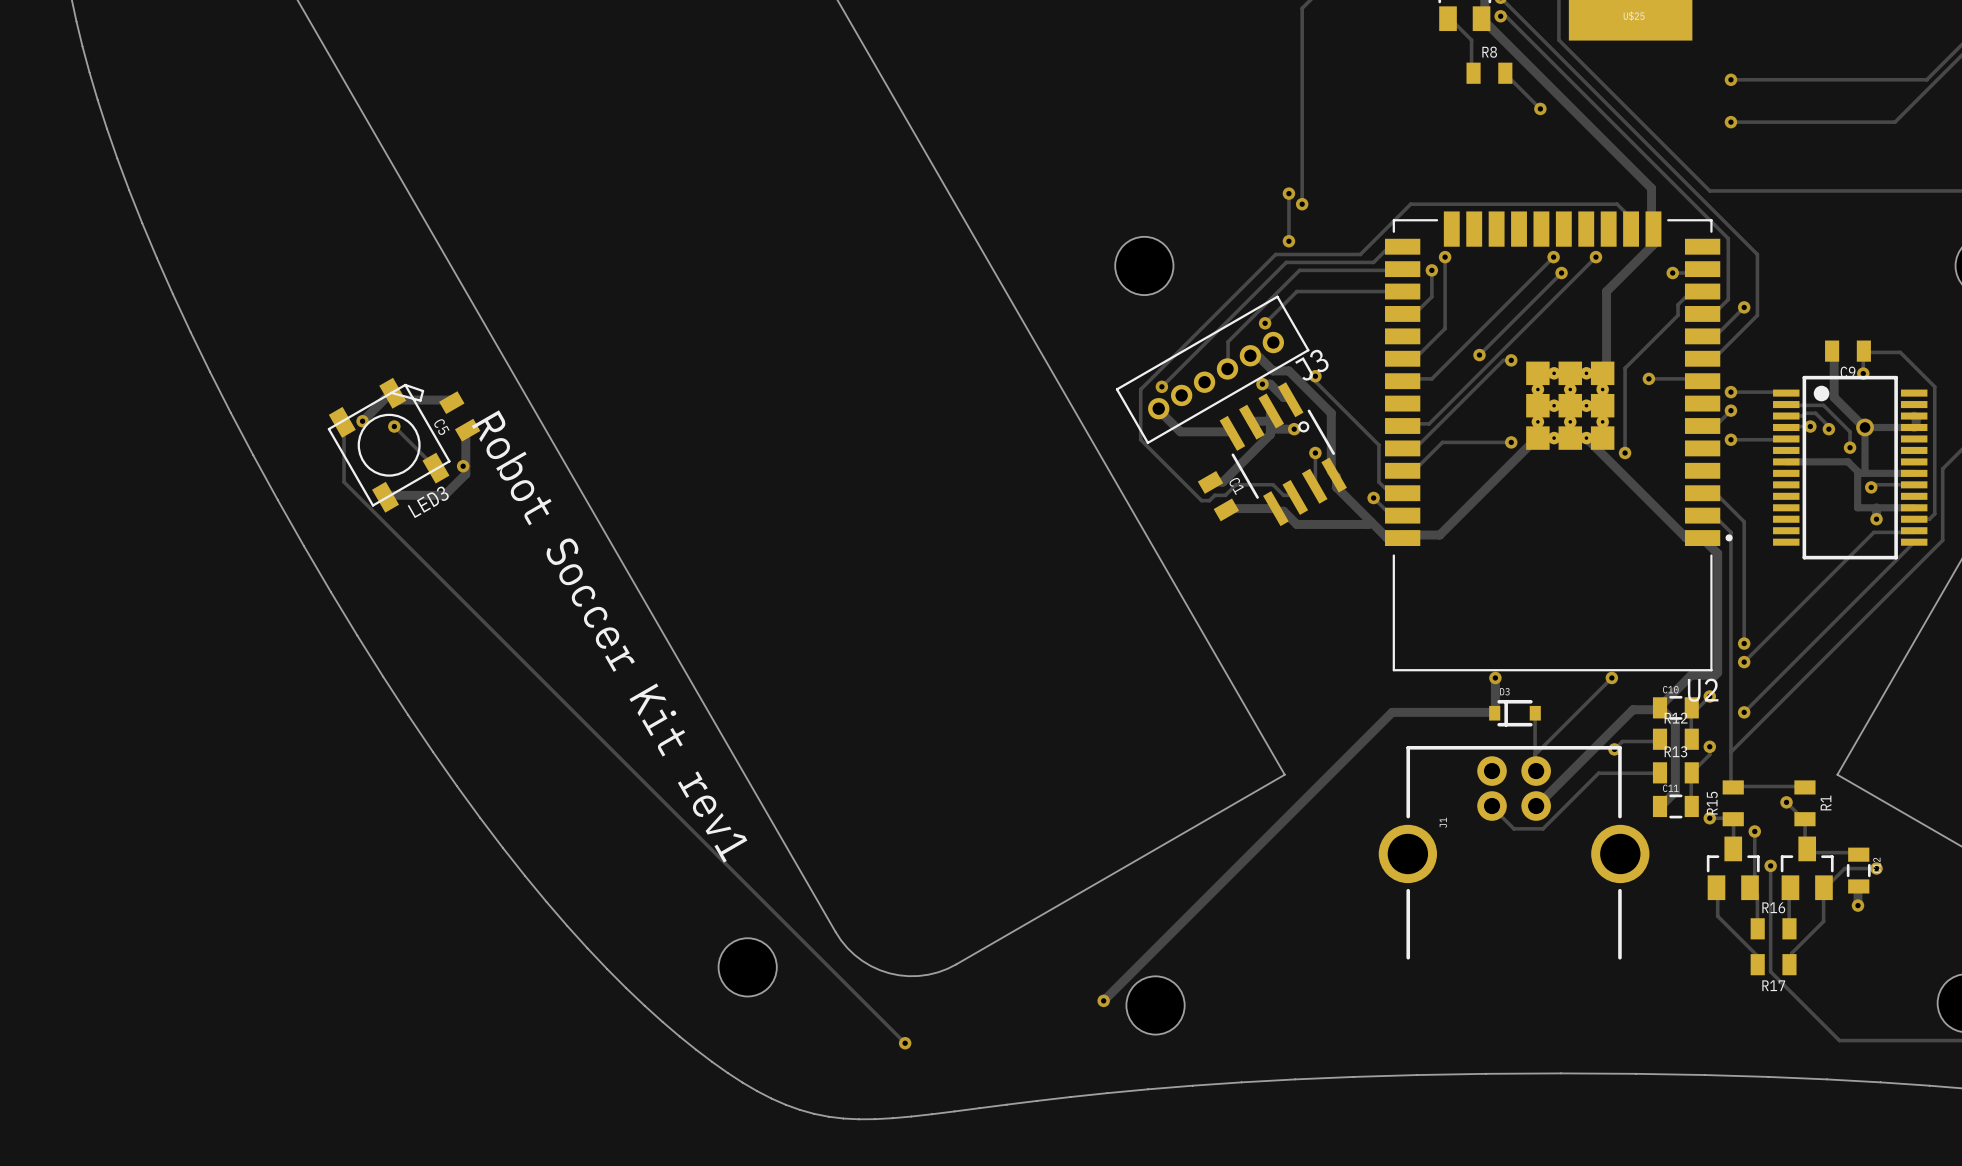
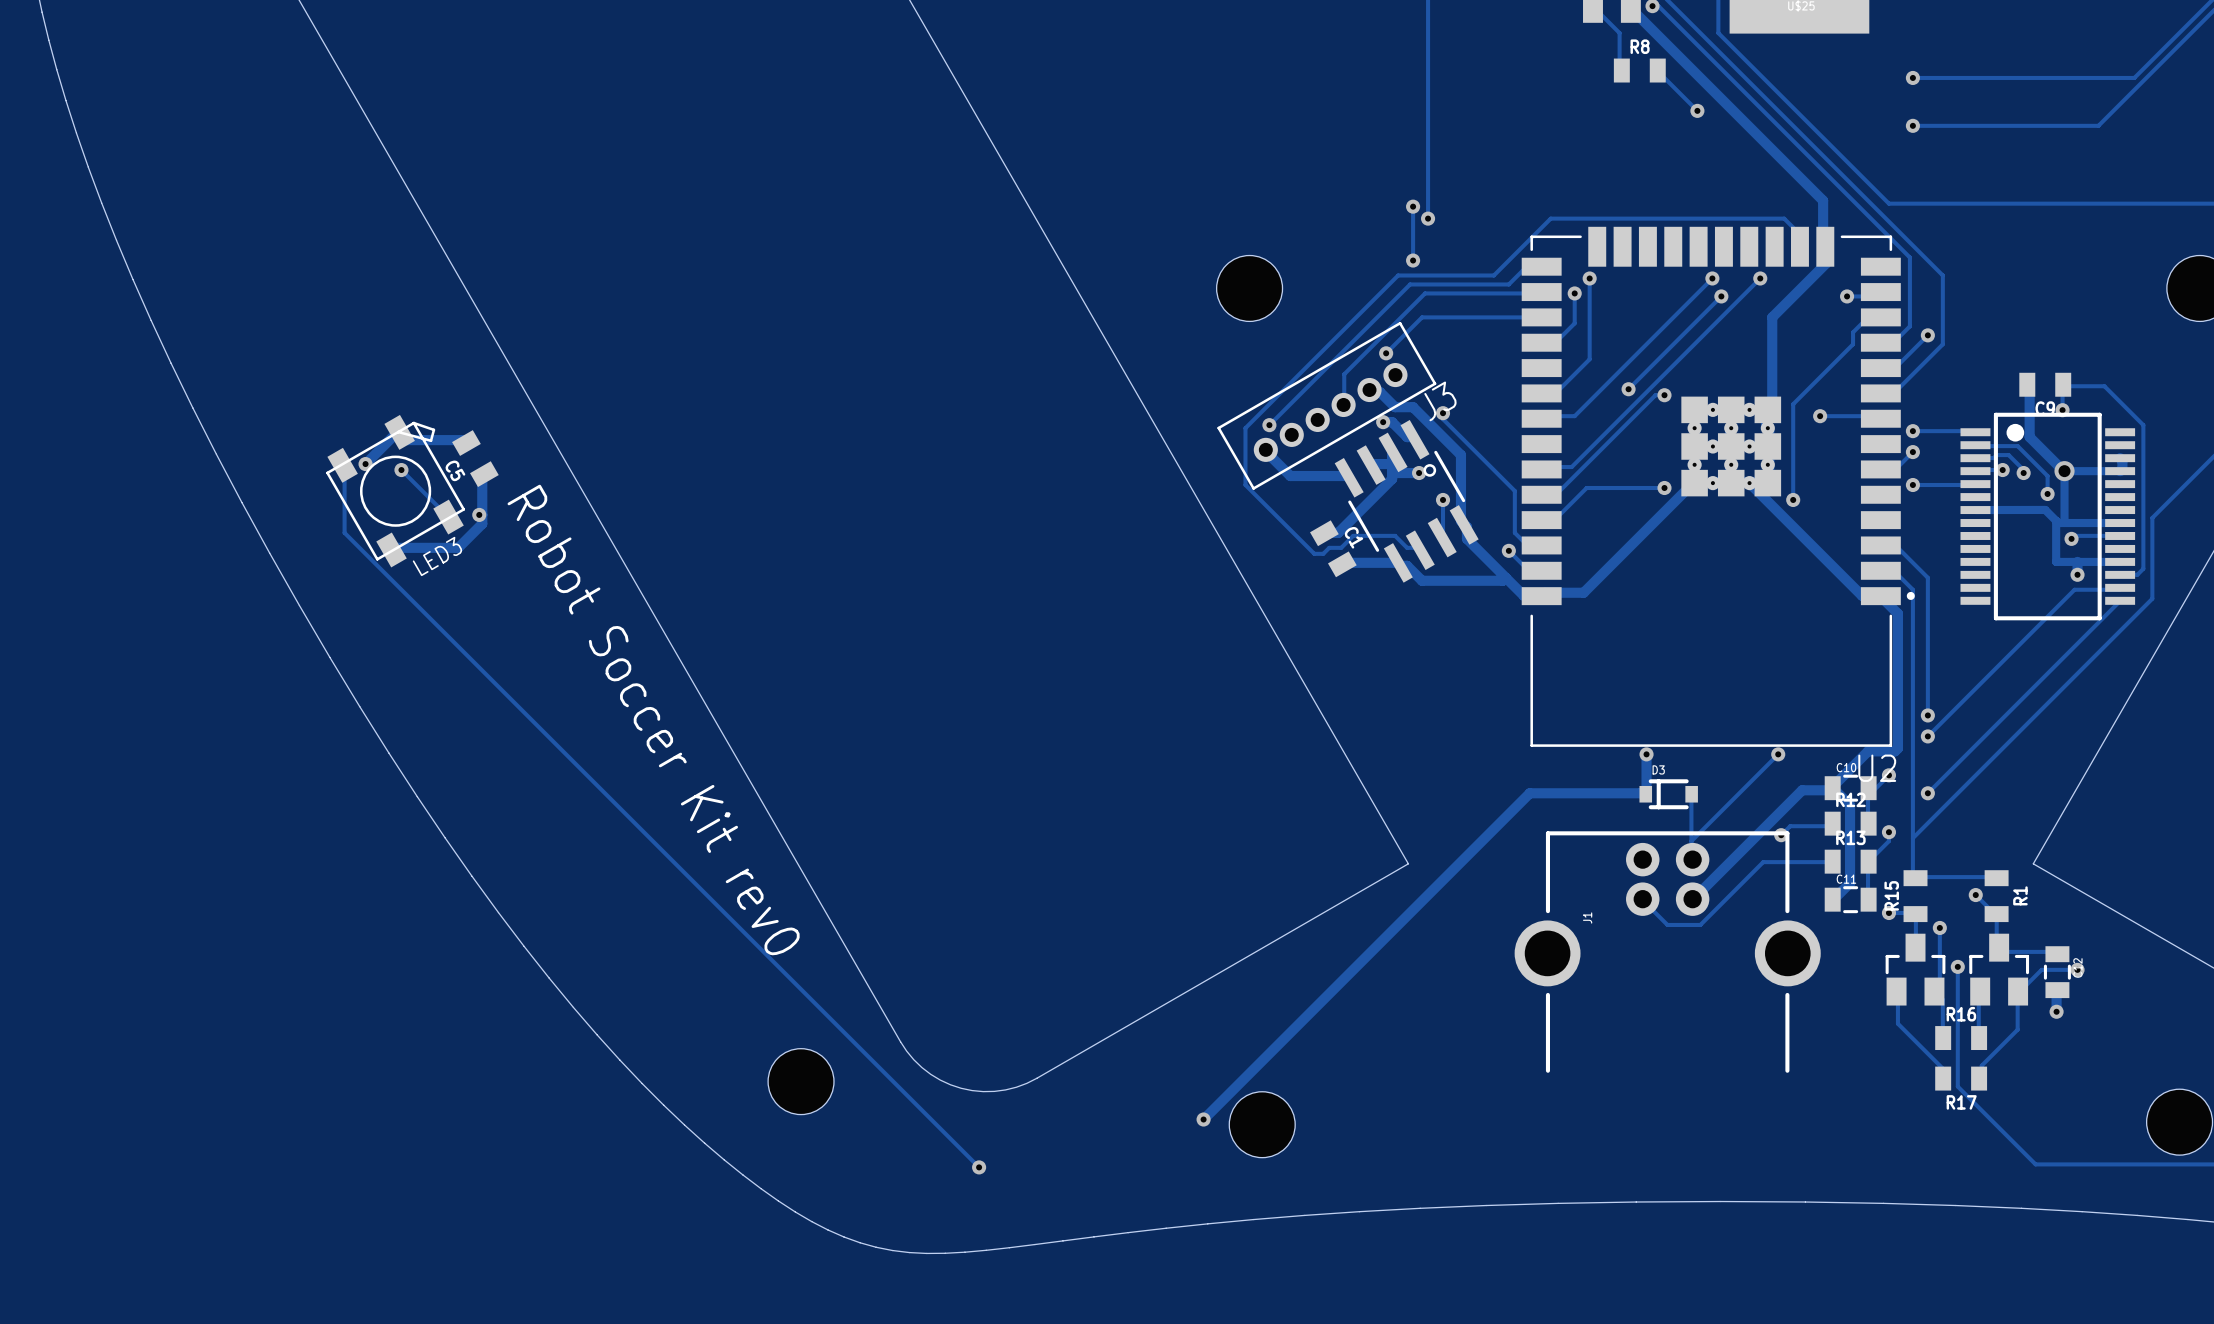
text: Robot Soccer Kit rev1 (609, 636) -> Robot Soccer Kit rev0 (653, 719)

